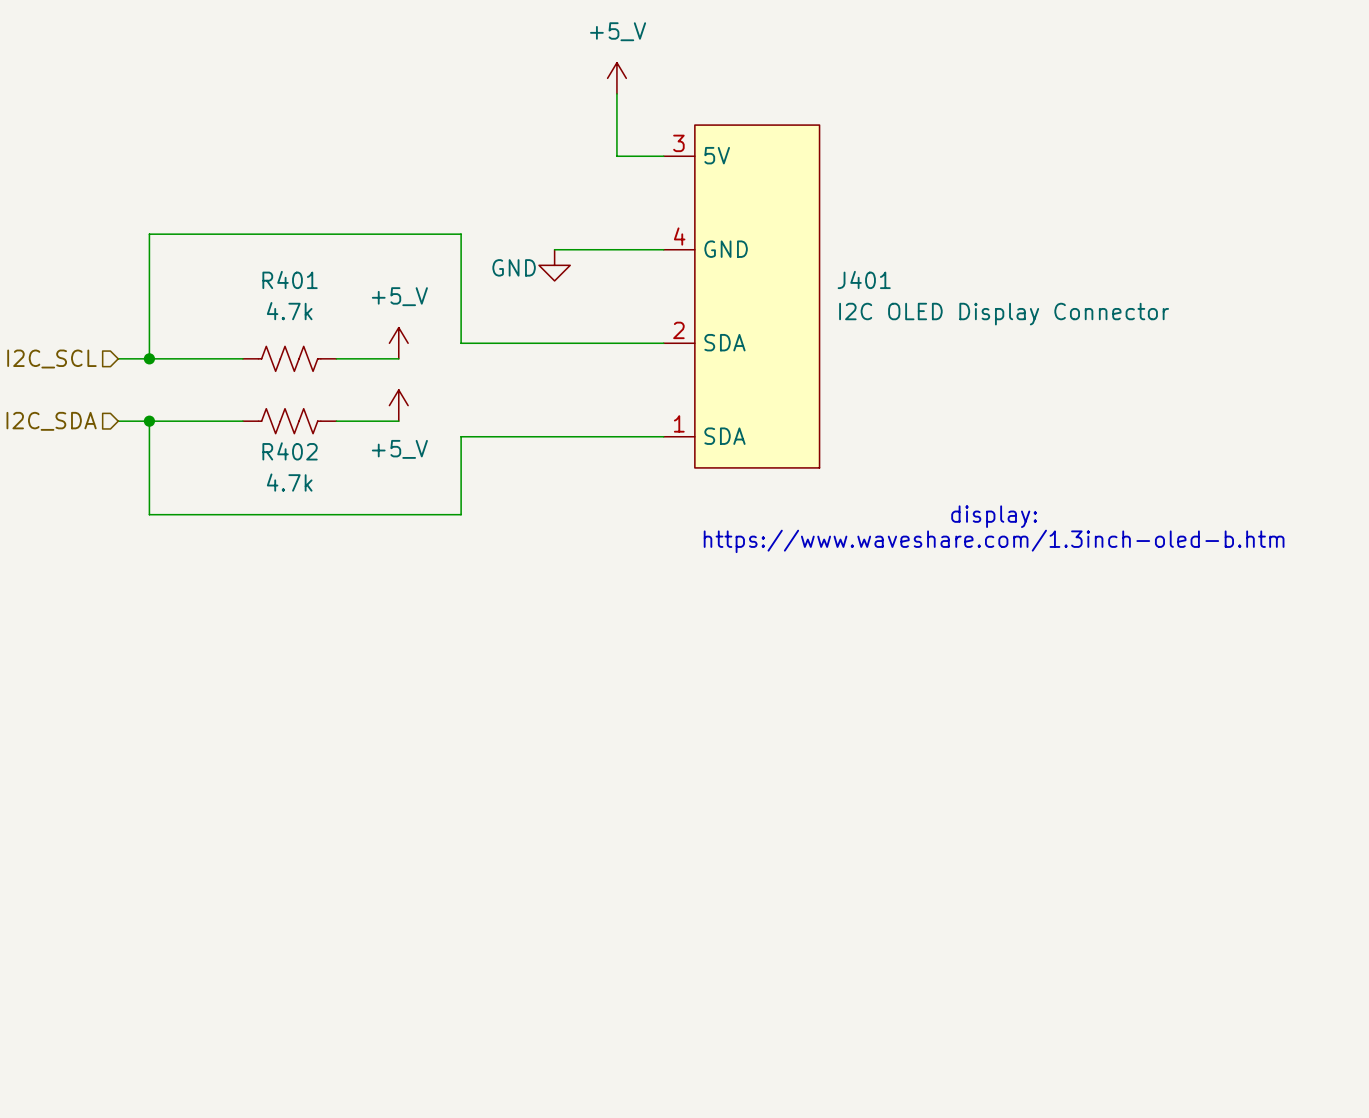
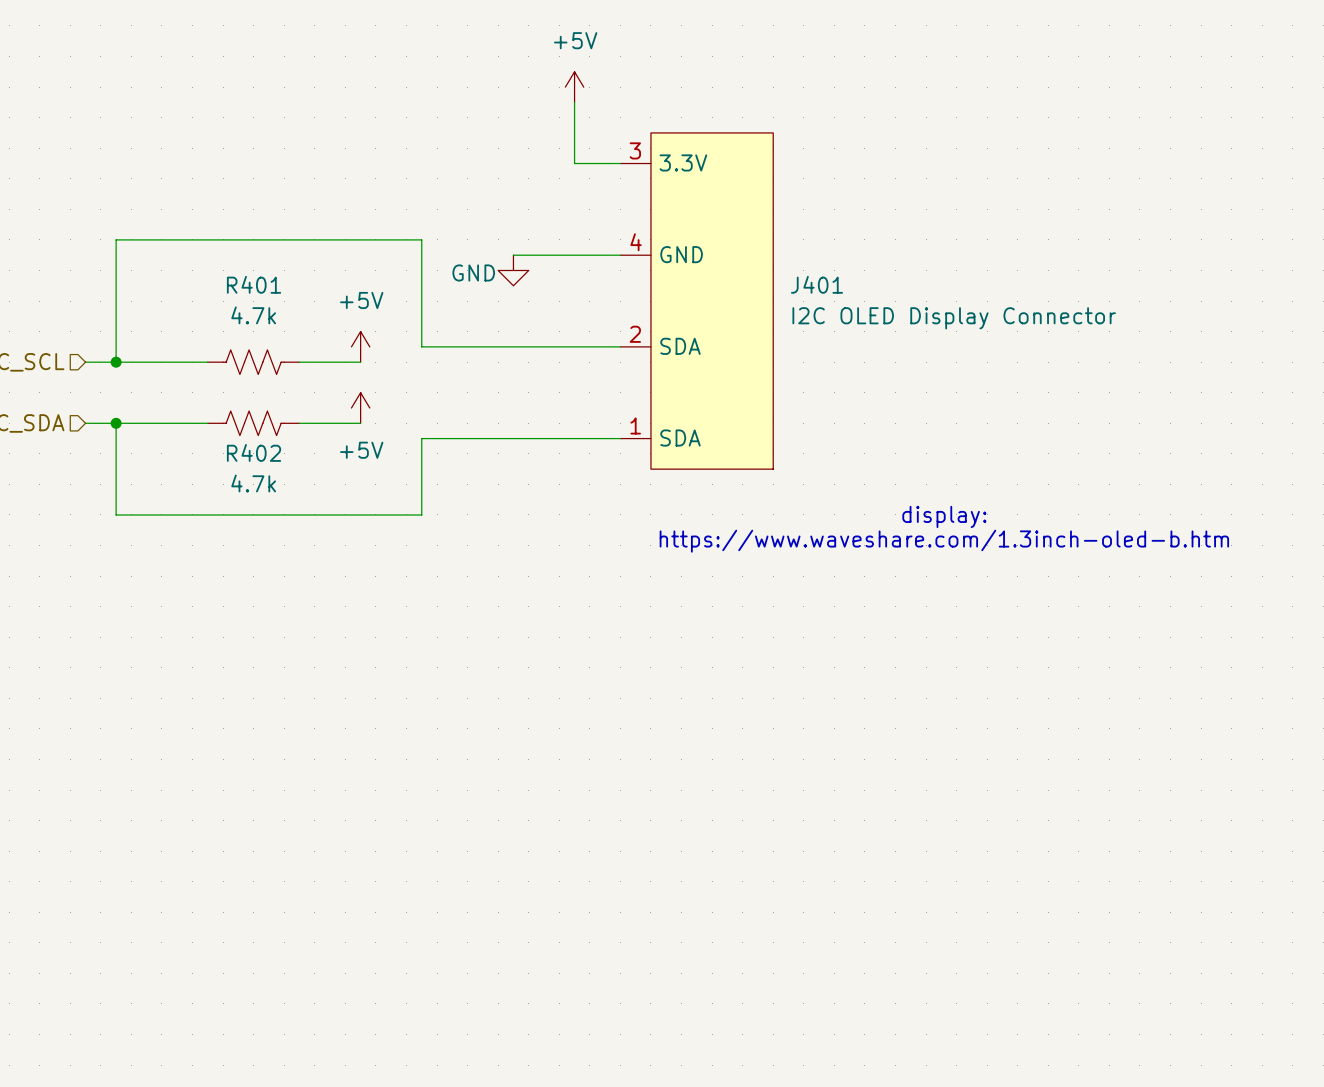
power symbol: +5_V (616, 78) -> +5V (574, 87)
J401 pin name: 5V (717, 155) -> 3.3V (683, 162)
power symbol: +5_V (398, 343) -> +5V (360, 346)
power symbol: +5_V (398, 405) -> +5V (360, 408)

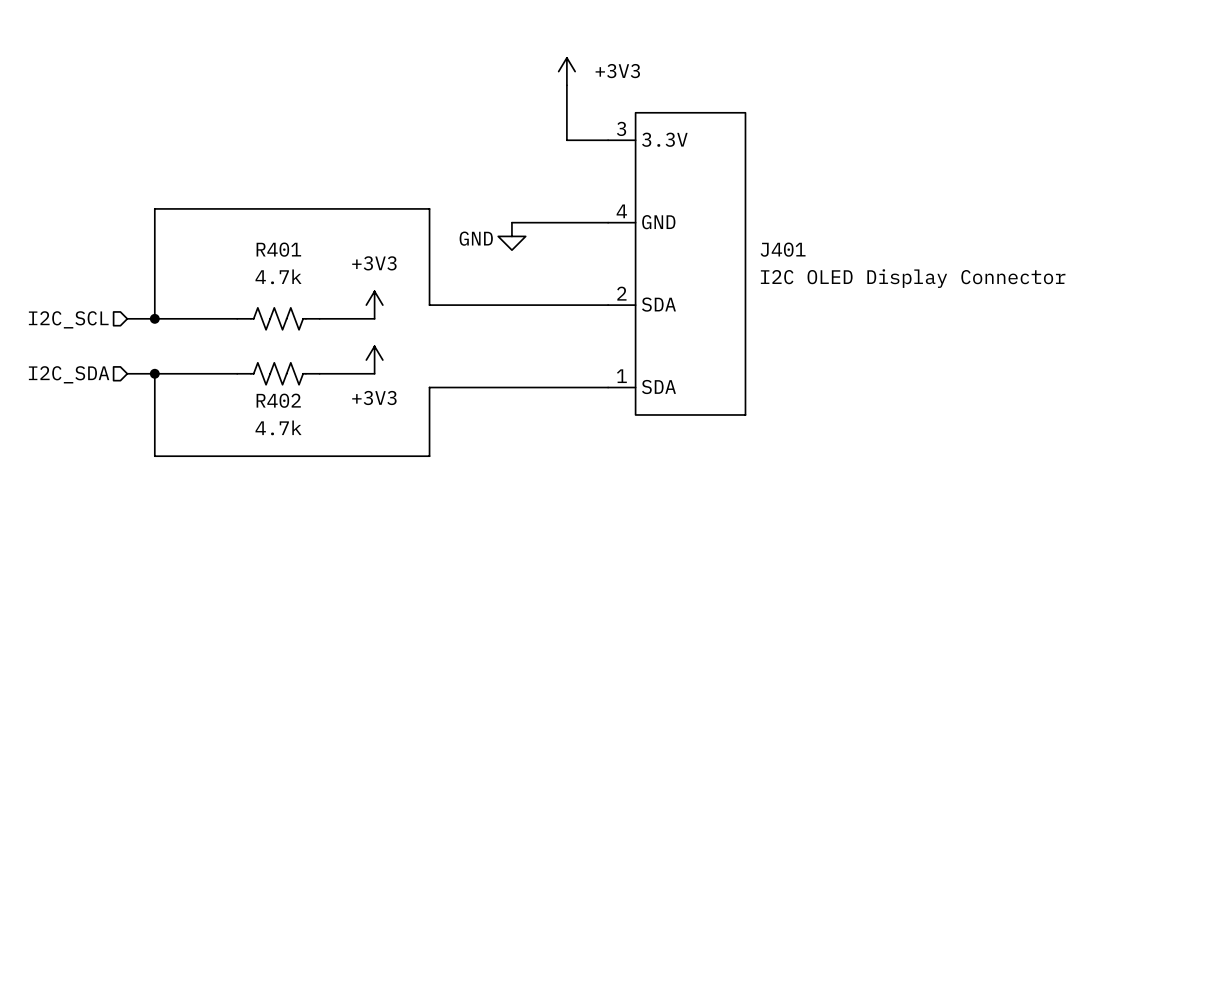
power symbol: +5V (574, 87) -> +3V3 (566, 71)
power symbol: +5V (360, 346) -> +3V3 (374, 305)
power symbol: +5V (360, 408) -> +3V3 (374, 360)
text: display: (944, 516) -> none
text: https://www.waveshare.com/1.3inch-oled-b.htm (944, 541) -> none

